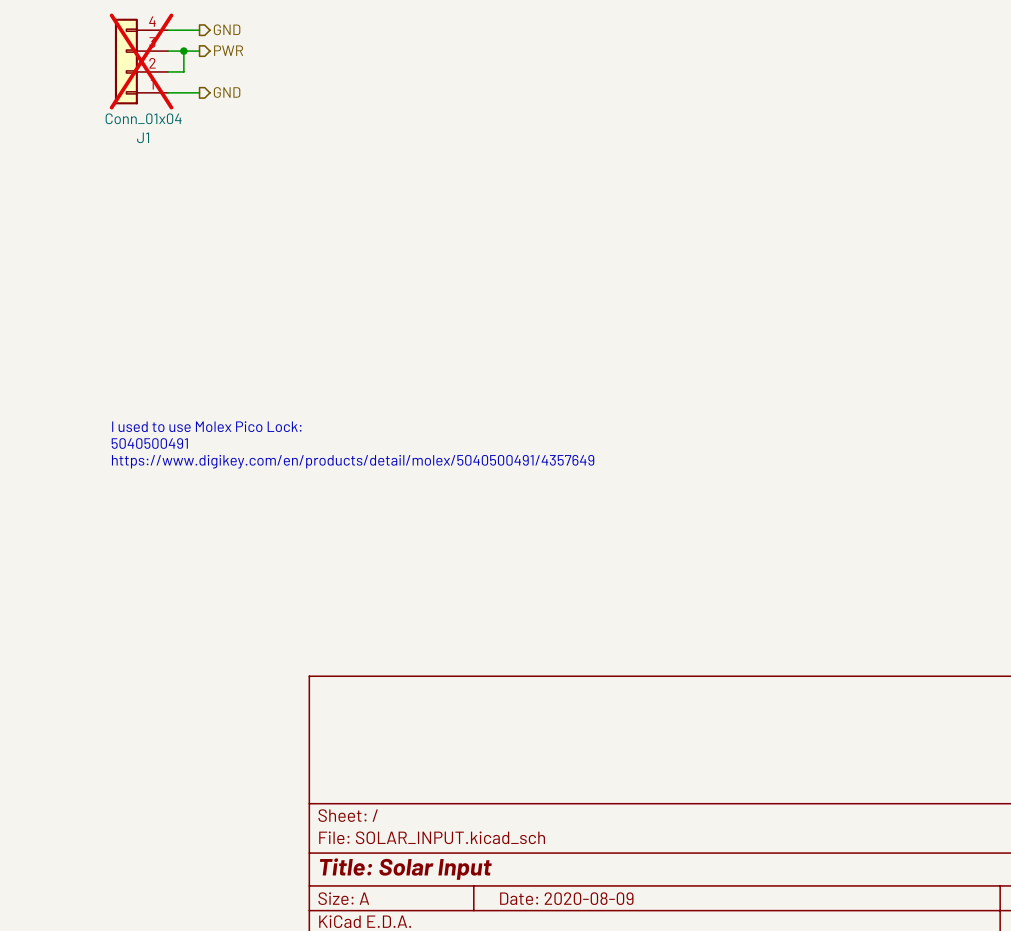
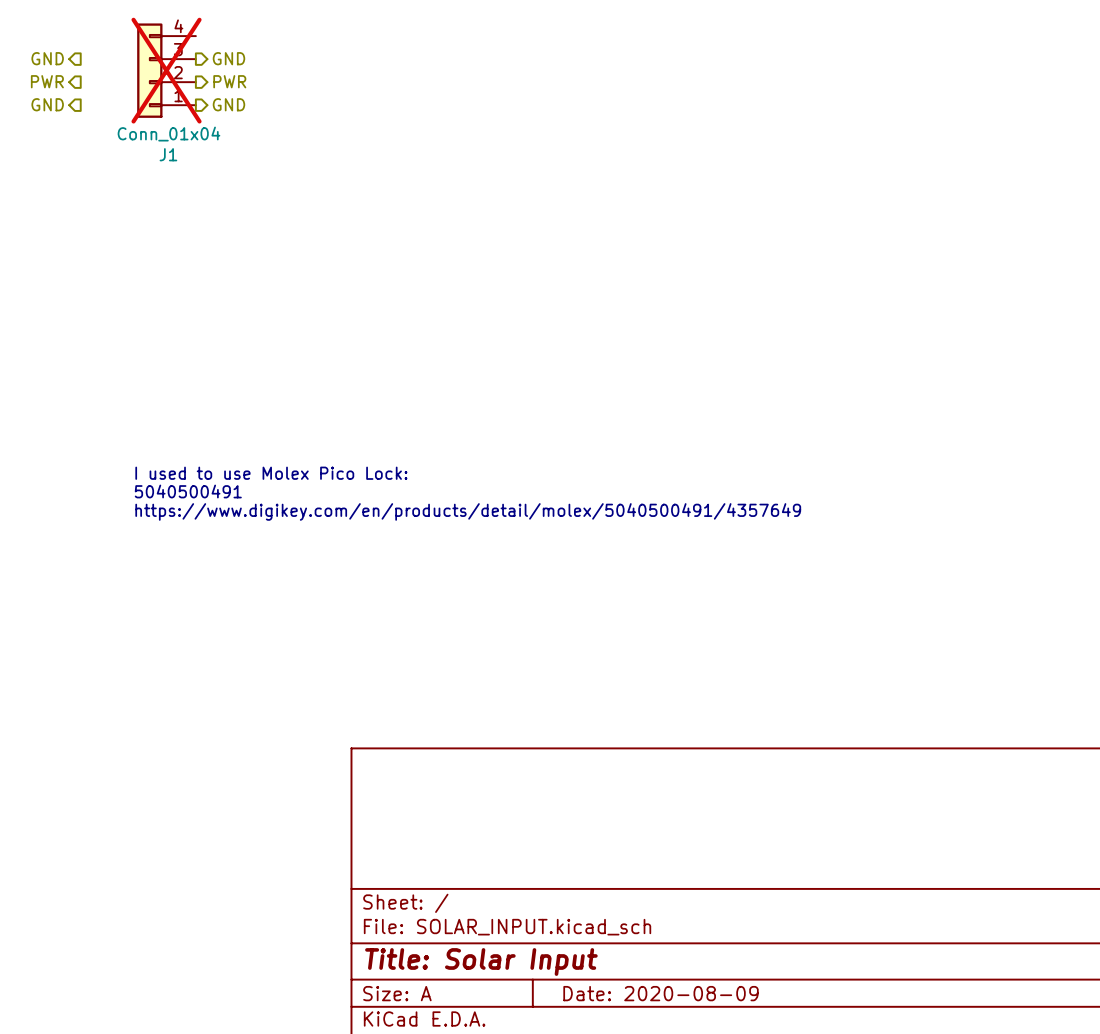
hierarchical label position: GND (227, 29) -> GND (228, 58)
wire: (168, 30) (199, 30) -> none
hierarchical label: none -> GND (47, 58)
hierarchical label position: PWR (228, 50) -> PWR (229, 81)
wire: (168, 51) (199, 51) -> none
wire: (183, 51) (183, 71) (168, 71) -> none
junction: (183, 51) -> none
hierarchical label: none -> PWR (47, 81)
hierarchical label: none -> GND (47, 104)
wire: (168, 92) (199, 92) -> none
hierarchical label position: GND (227, 92) -> GND (228, 104)

